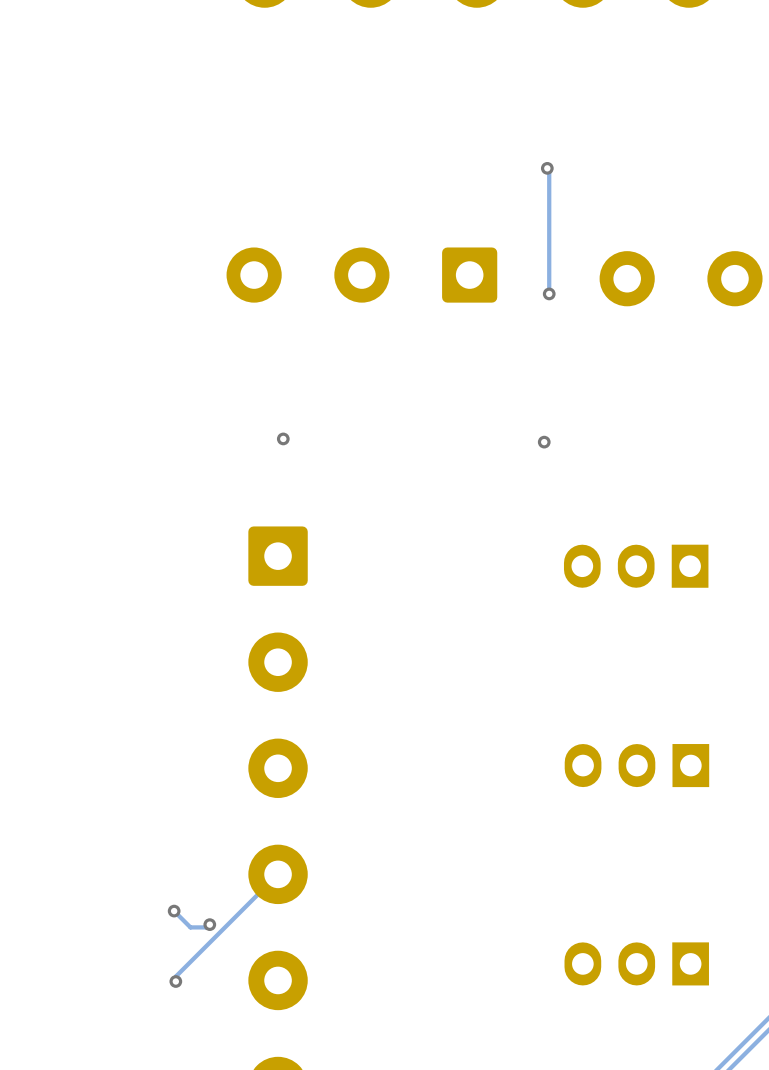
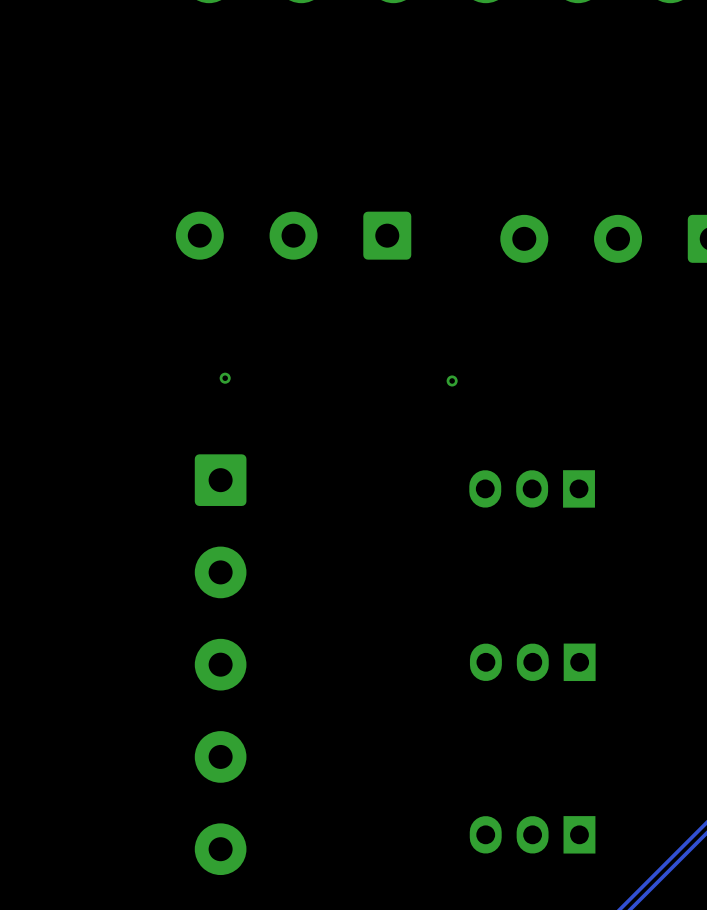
track: (547, 168) (549, 170) (549, 293) -> none
via: (547, 168) -> none
via: (549, 293) -> none
track: (278, 874) (175, 976) (175, 981) -> none
track: (174, 911) (190, 927) (206, 927) (209, 924) -> none
via: (174, 911) -> none
via: (209, 924) -> none
via: (175, 981) -> none

